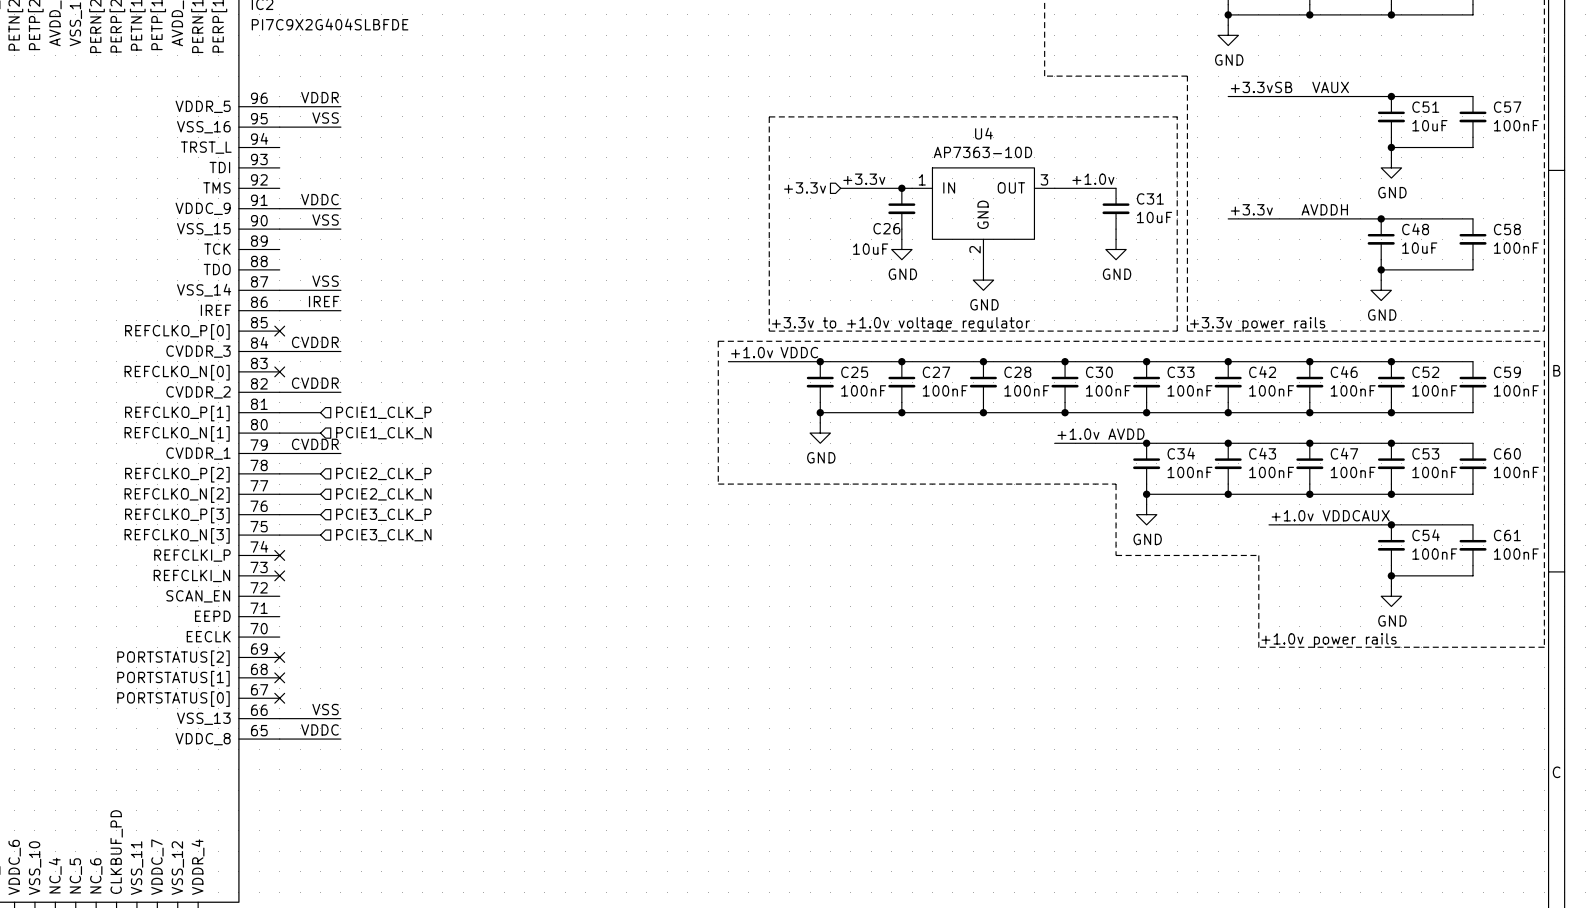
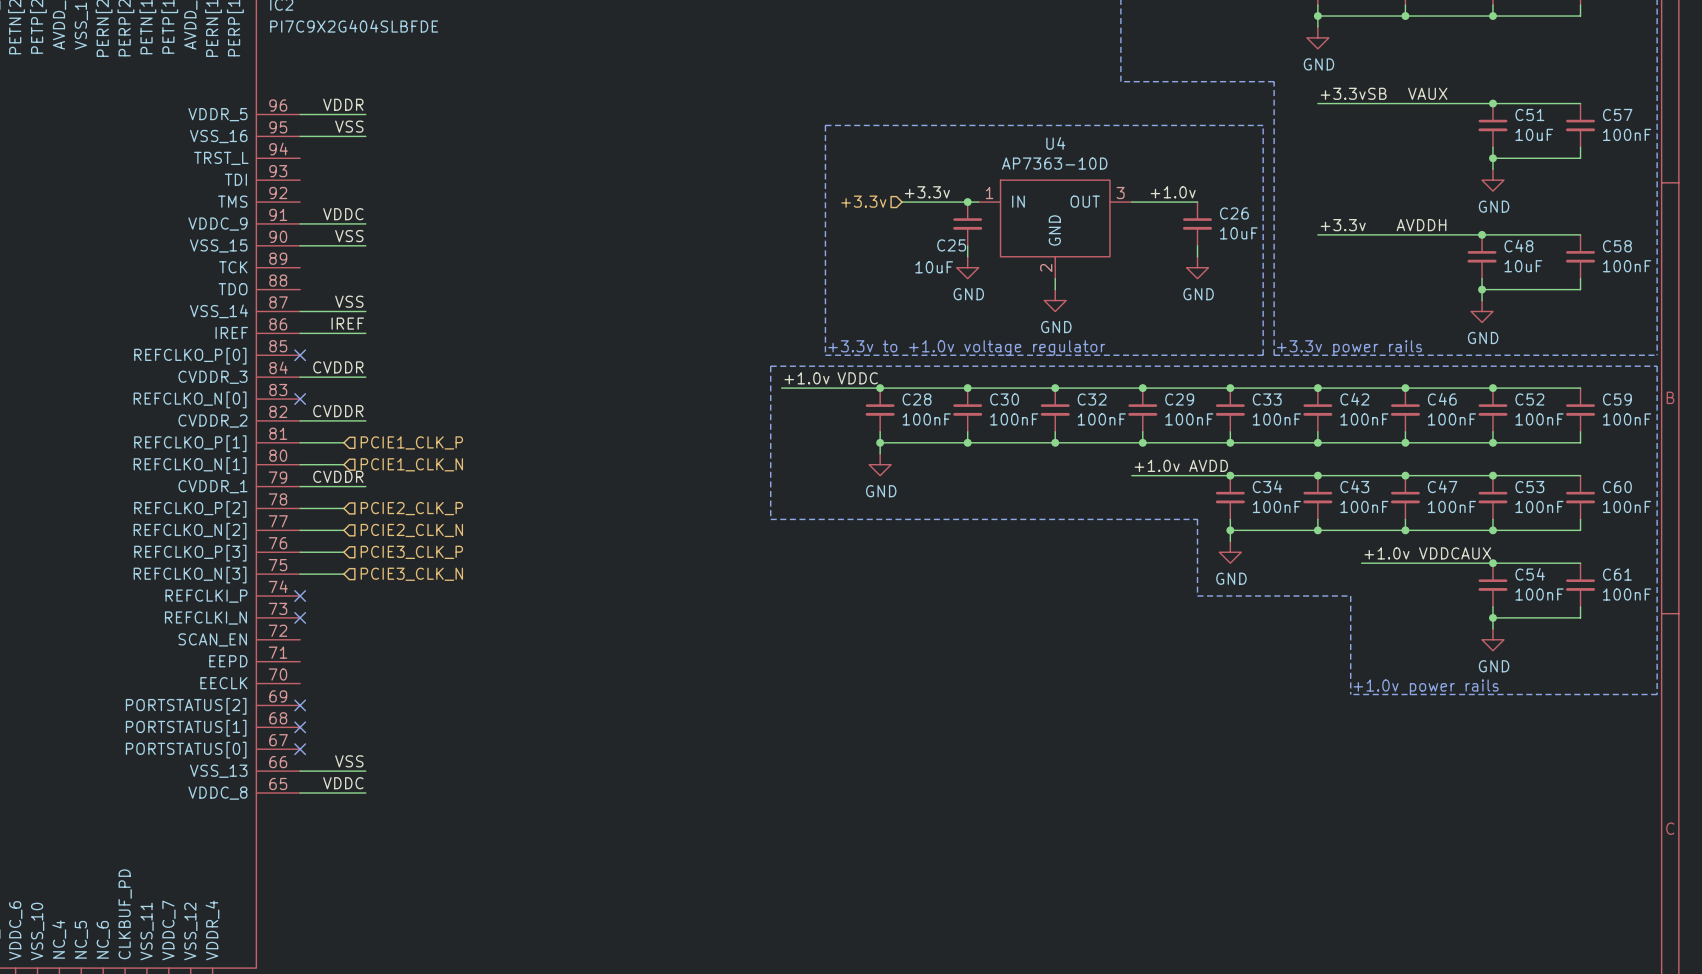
C31 name: C31 (1150, 198) -> C26 (1234, 213)
C26 name: C26 (886, 228) -> C25 (951, 245)
C25 name: C25 (854, 372) -> C28 (917, 399)
C27 name: C27 (936, 372) -> C30 (1004, 399)
C28 name: C28 (1017, 372) -> C32 (1092, 399)
C30 name: C30 (1099, 372) -> C29 (1179, 399)

